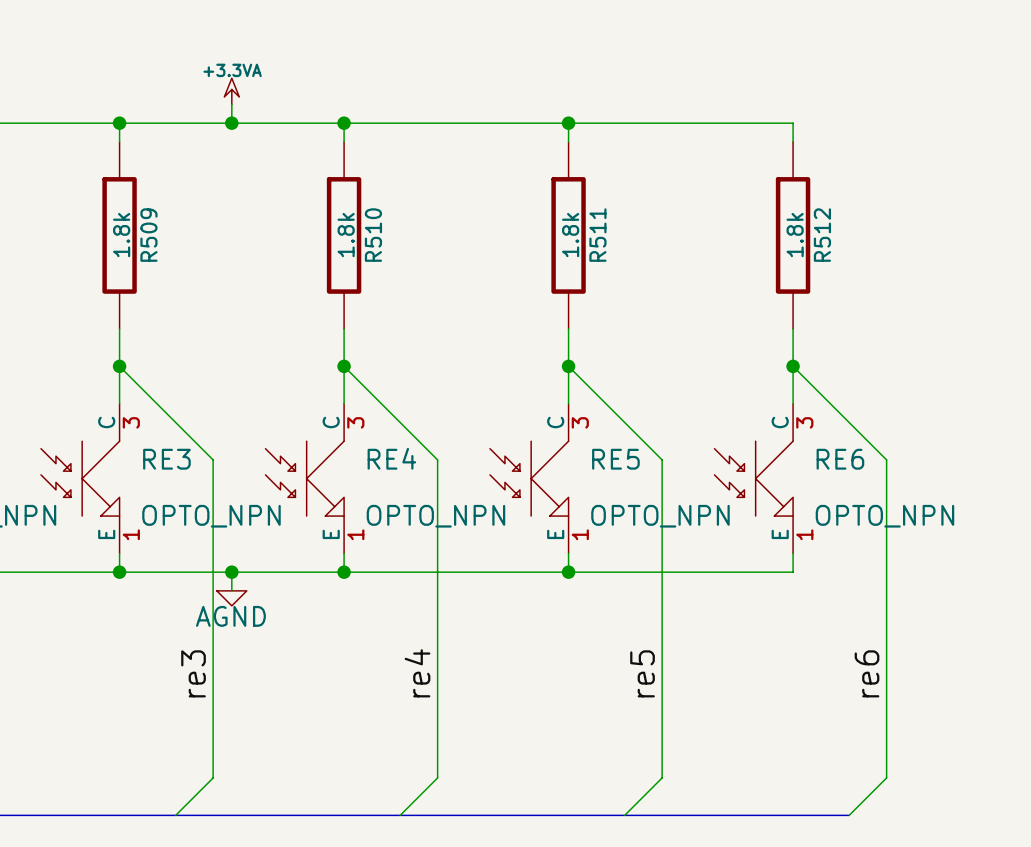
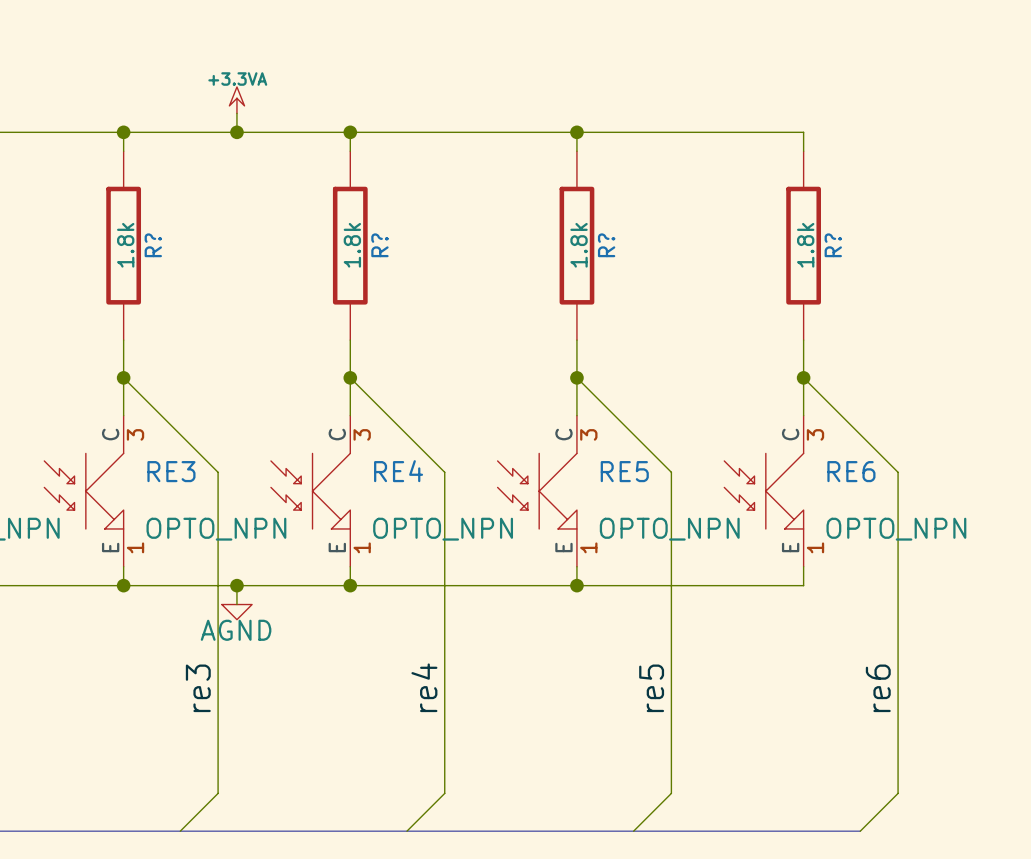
R509 name: R509 (148, 235) -> R? (153, 245)
R510 name: R510 (373, 235) -> R? (379, 245)
R511 name: R511 (597, 235) -> R? (606, 245)
R512 name: R512 (822, 235) -> R? (833, 245)

